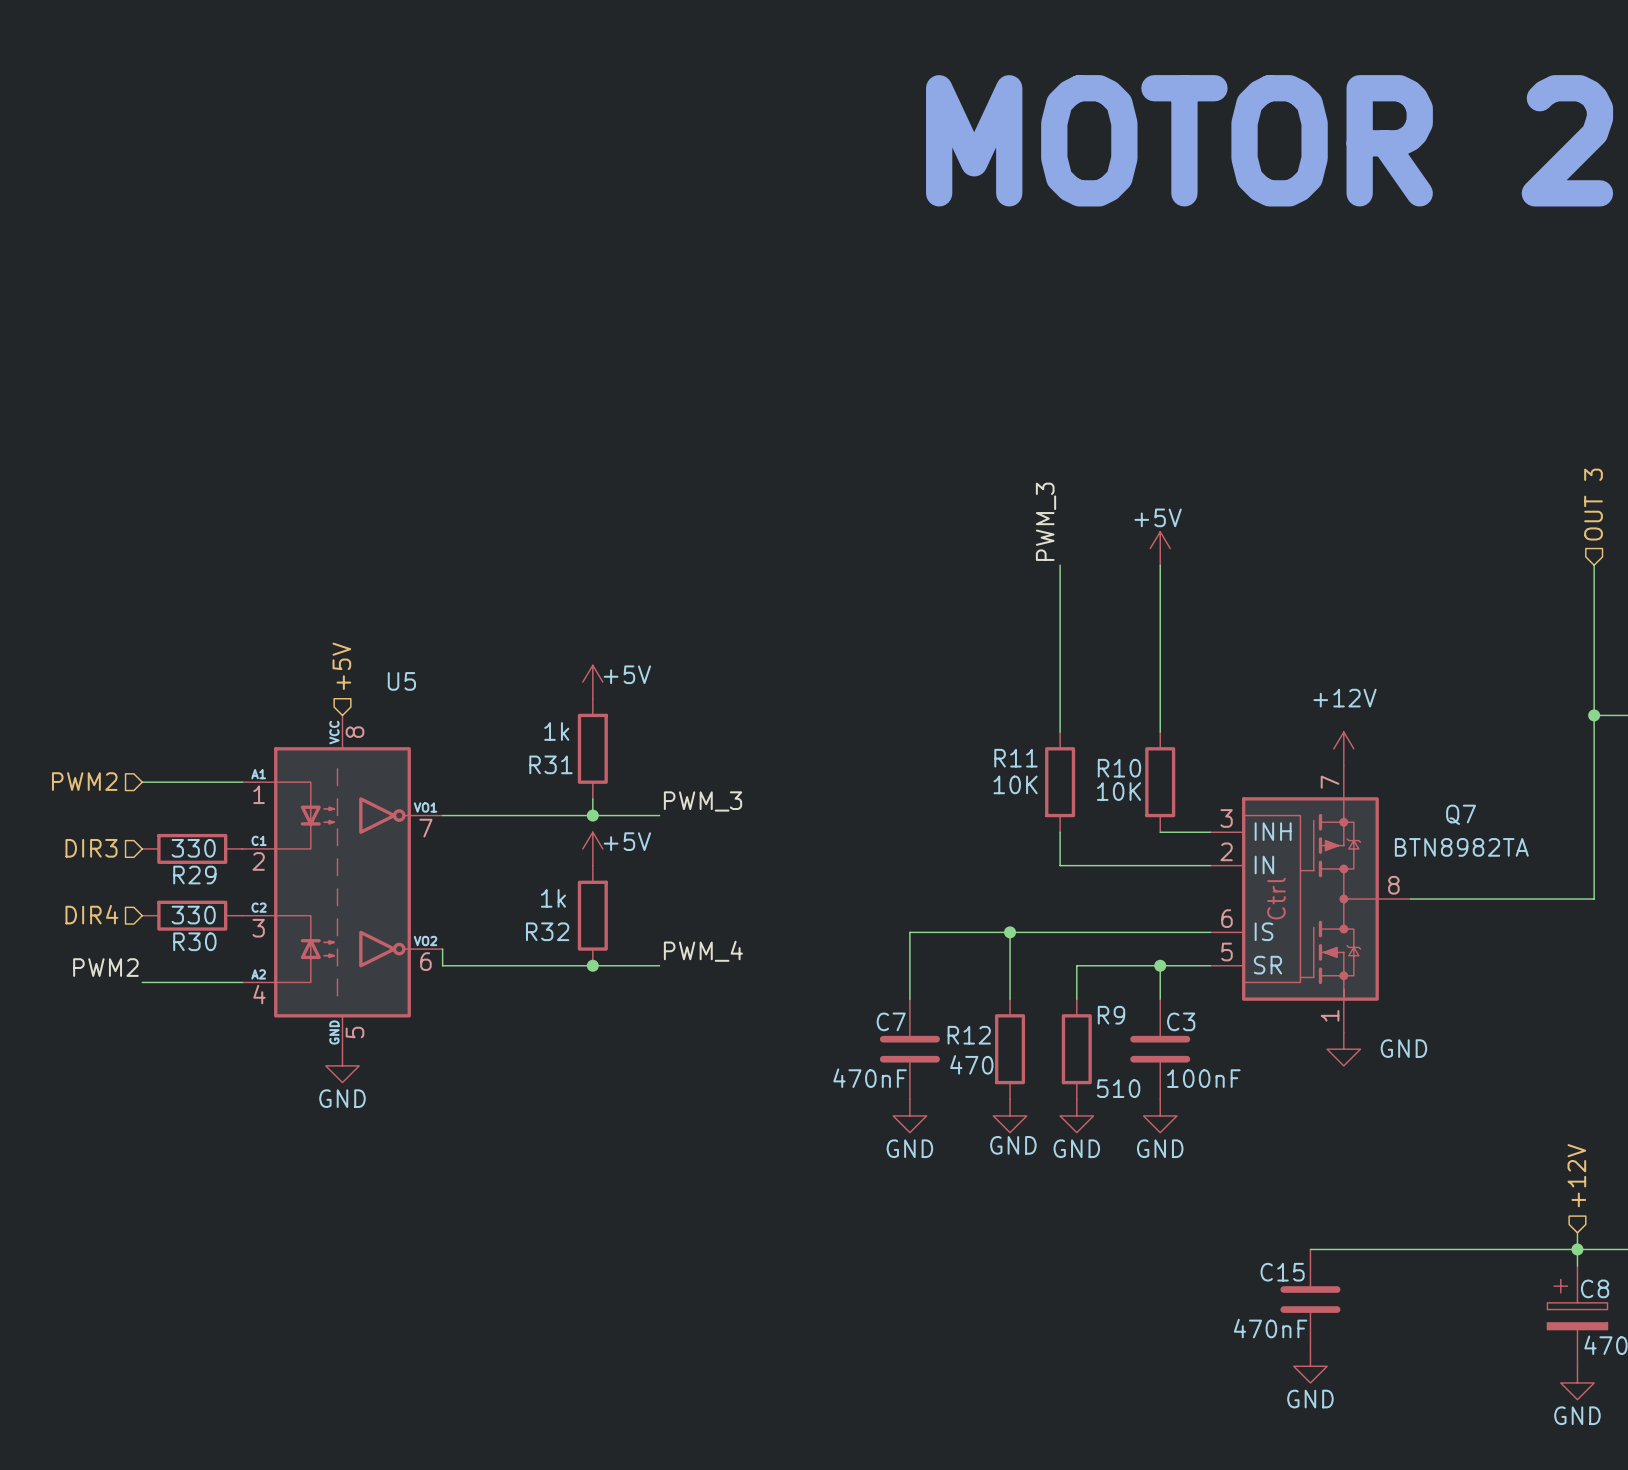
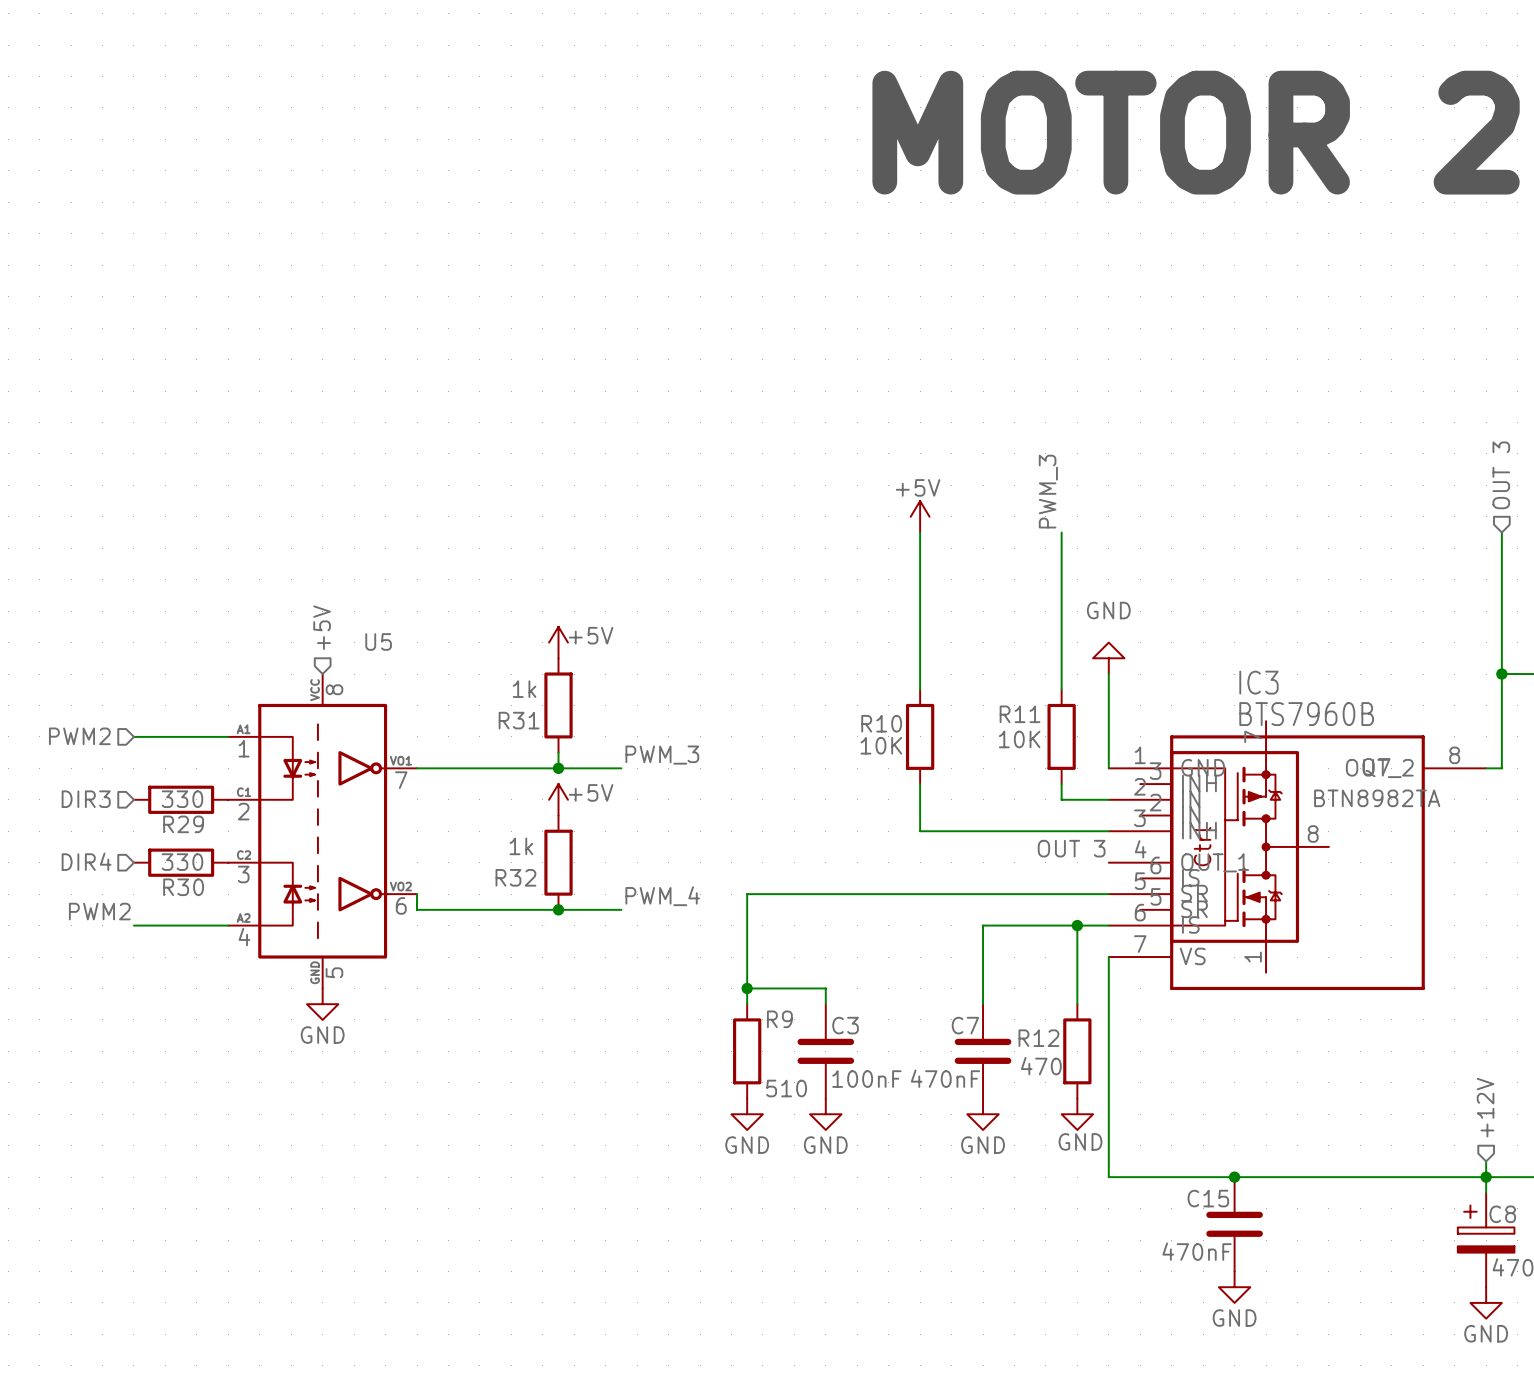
label position: PWM_3 (1046, 521) -> PWM_3 (1048, 491)
power symbol position: +5V (1160, 548) -> +5V (920, 516)
wire: (1060, 565) (1060, 732) -> (920, 532) (920, 689)
wire: (1160, 565) (1160, 732) -> (1061, 532) (1061, 689)
power symbol: none -> GND (1108, 658)
wire: none -> (1108, 674) (1108, 768)
power symbol: +12V (1343, 748) -> none
R11 position: (1060, 782) -> (1061, 736)
R10 position: (1160, 782) -> (920, 736)
wire: (1594, 815) (1594, 899) (1410, 899) -> (1501, 768) (1486, 768)
wire: none -> (920, 784) (920, 831) (1108, 831)
wire: (1060, 832) (1060, 865) (1210, 865) -> none
wire: none -> (1061, 784) (1061, 799) (1108, 799)
wire: (1160, 832) (1210, 832) -> none
label: none -> OUT 3 (1071, 848)
IC3: none -> BTS7960B (1297, 862)
wire: (1010, 932) (1010, 999) -> none
junction: (1010, 932) -> none
wire: (1210, 932) (909, 932) (909, 999) -> none
wire: none -> (1108, 894) (747, 894) (747, 1004)
wire: (1160, 965) (1160, 999) -> none
junction position: (1160, 965) -> (1077, 925)
wire: (1210, 965) (1076, 965) (1076, 999) -> none
wire: none -> (1077, 925) (1077, 1004)
wire: none -> (1108, 925) (983, 925) (983, 1004)
wire: none -> (1108, 957) (1108, 1177) (1234, 1177)
wire: none -> (747, 988) (825, 988) (825, 1004)
junction: none -> (747, 988)
C7 position: (909, 1049) -> (983, 1051)
R12 position: (1010, 1049) -> (1077, 1051)
R9 position: (1076, 1049) -> (747, 1051)
C3 position: (1160, 1049) -> (825, 1051)
power symbol: GND (1343, 1049) -> none
power symbol: GND (909, 1115) -> none
power symbol: GND (1010, 1115) -> none
power symbol: GND (1076, 1115) -> none
power symbol: GND (1160, 1115) -> none
power symbol: none -> GND (747, 1114)
power symbol: none -> GND (825, 1114)
power symbol: none -> GND (983, 1114)
power symbol: none -> GND (1077, 1114)
junction: none -> (1234, 1177)

